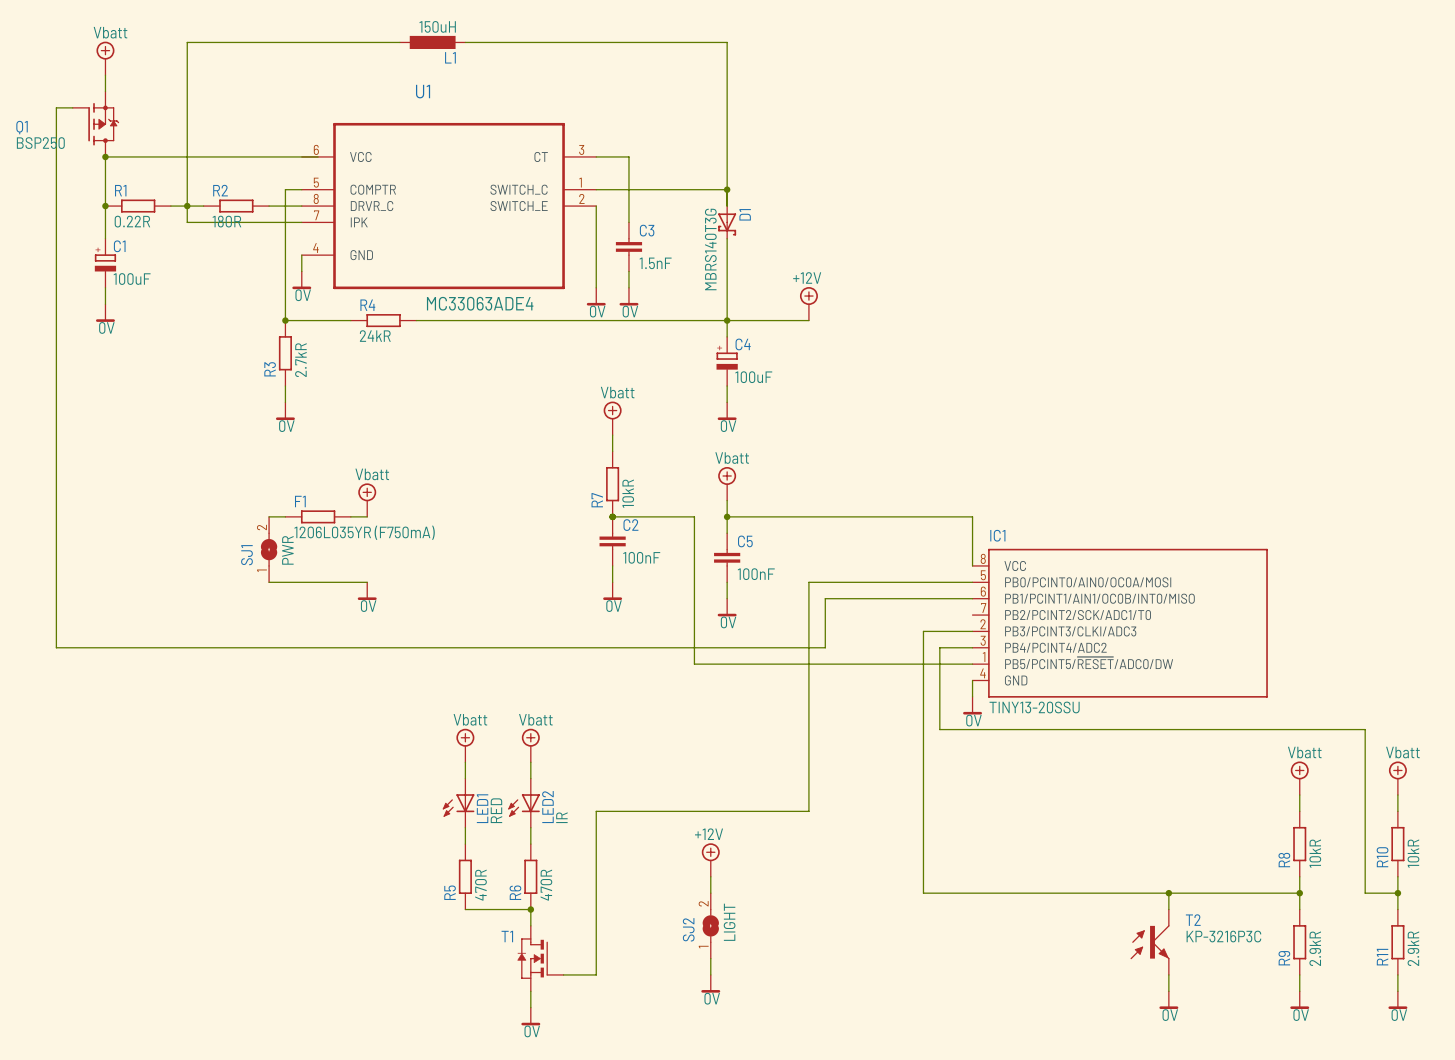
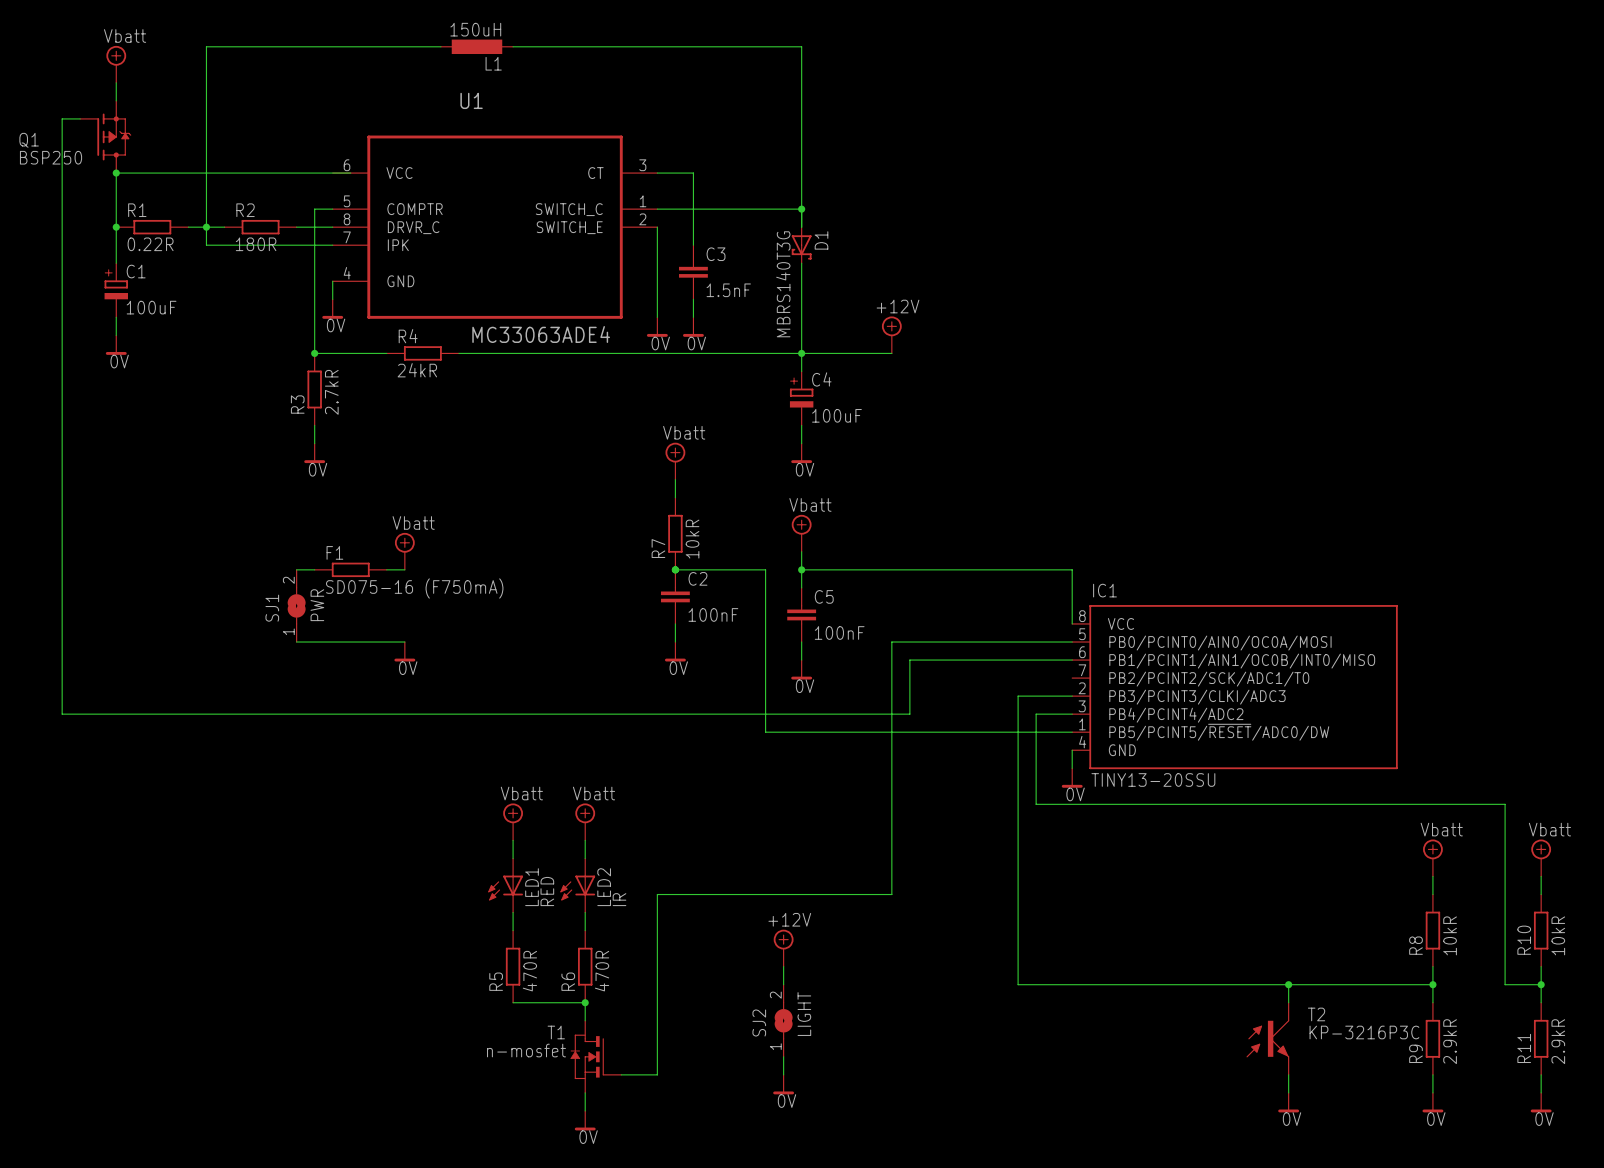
F1 value: 1206L035YR (F750mA) (364, 532) -> SD075-16 (F750mA) (414, 588)
T1 value: none -> n-mosfet (526, 1050)

